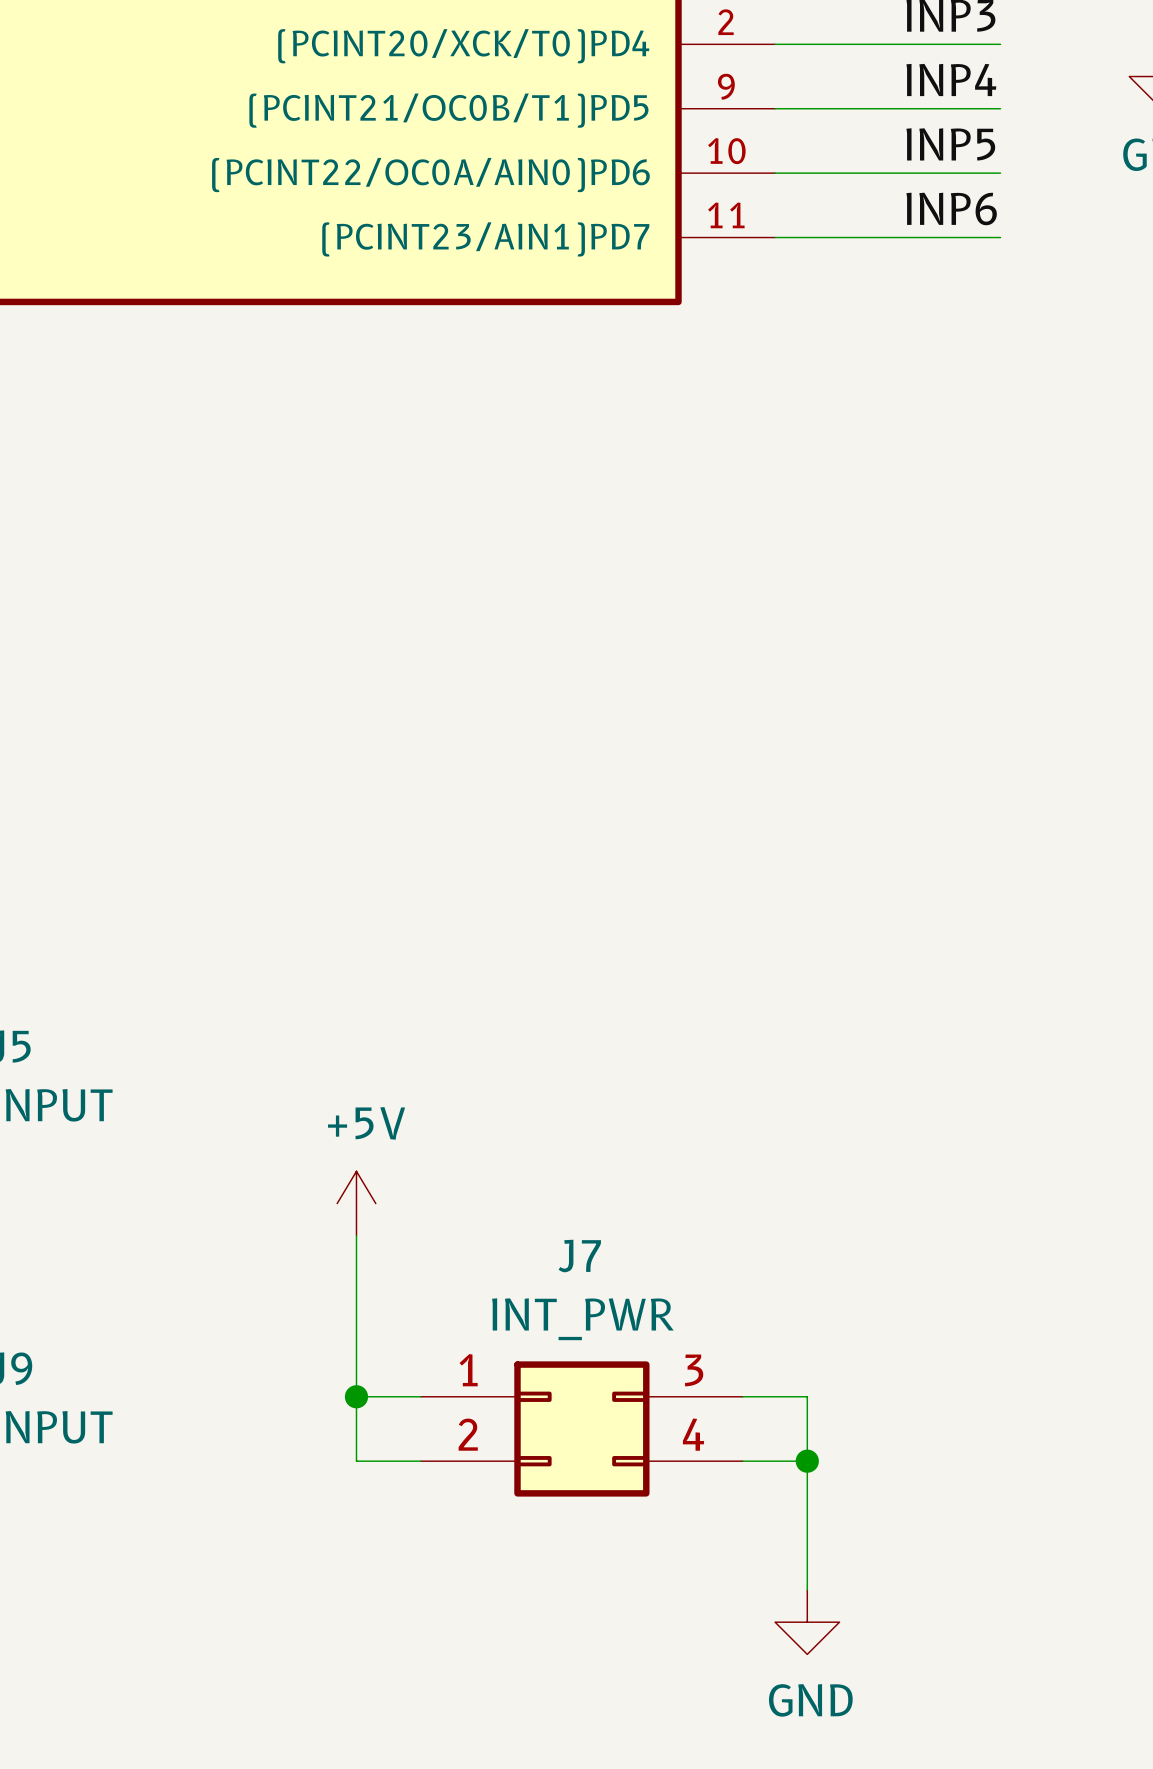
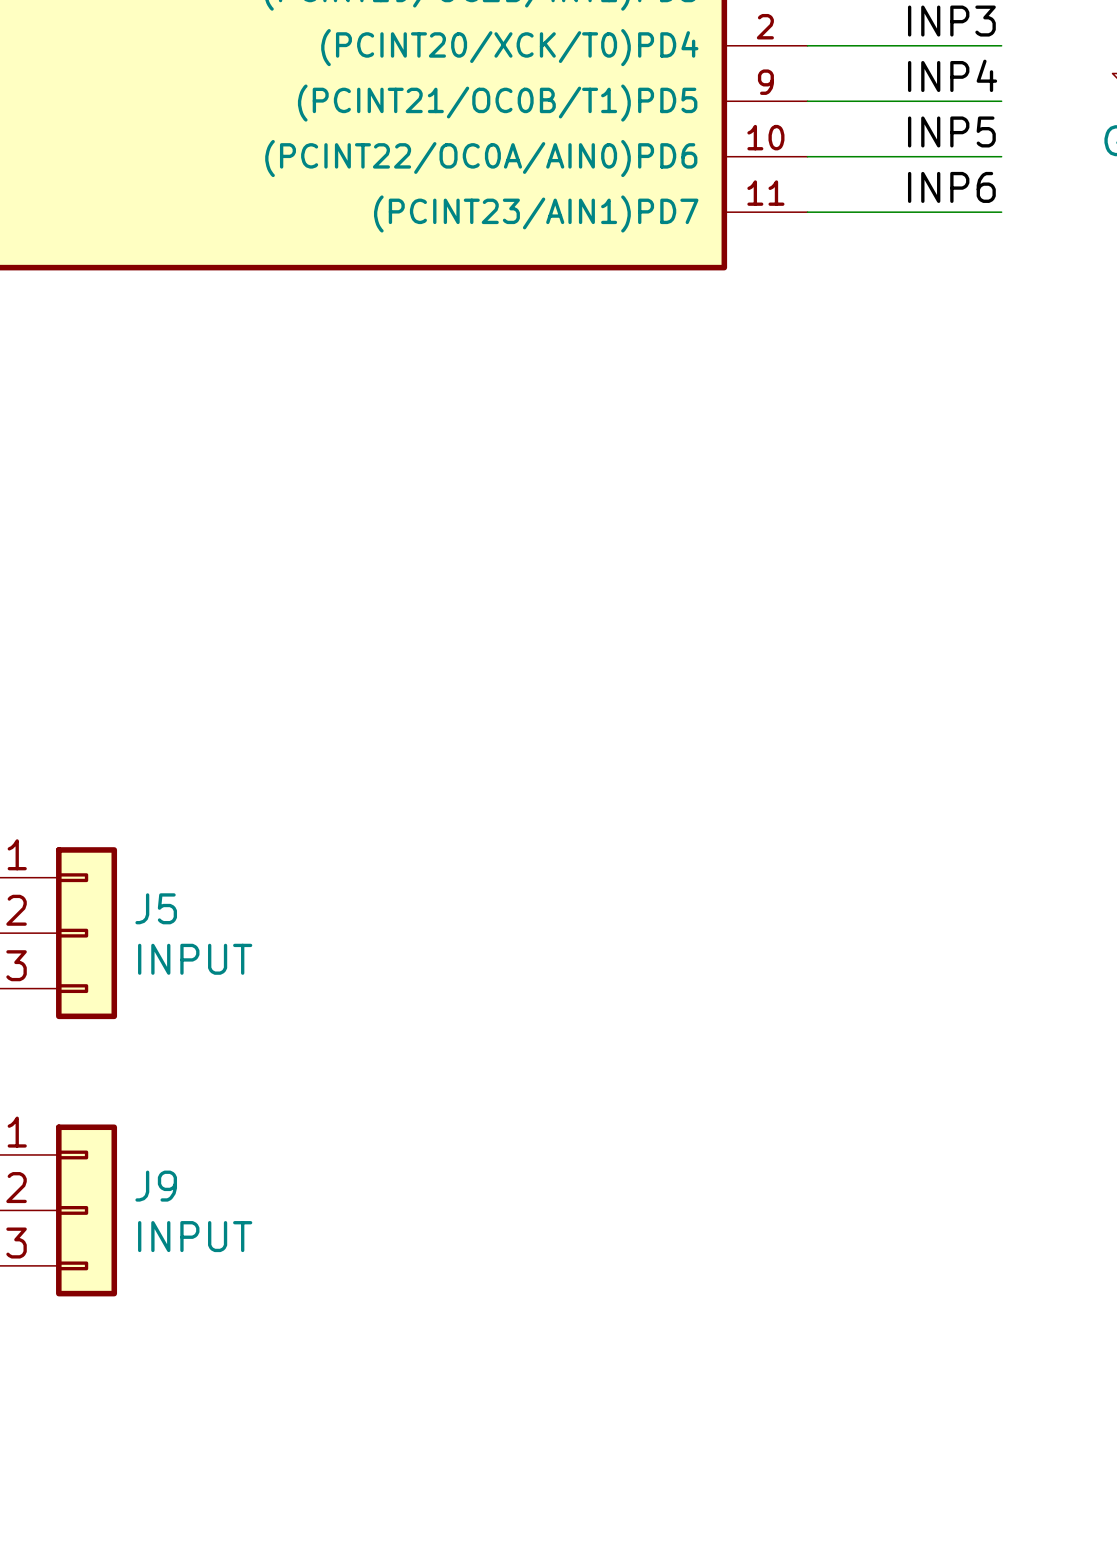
power symbol: +5V (356, 1203) -> none
wire: (356, 1235) (356, 1461) (420, 1461) -> none
wire: (356, 1396) (420, 1396) -> none
junction: (356, 1396) -> none
wire: (742, 1396) (807, 1396) (807, 1589) -> none
J7: INT_PWR (581, 1428) -> none
wire: (742, 1461) (807, 1461) -> none
junction: (807, 1461) -> none
power symbol: GND (807, 1622) -> none

